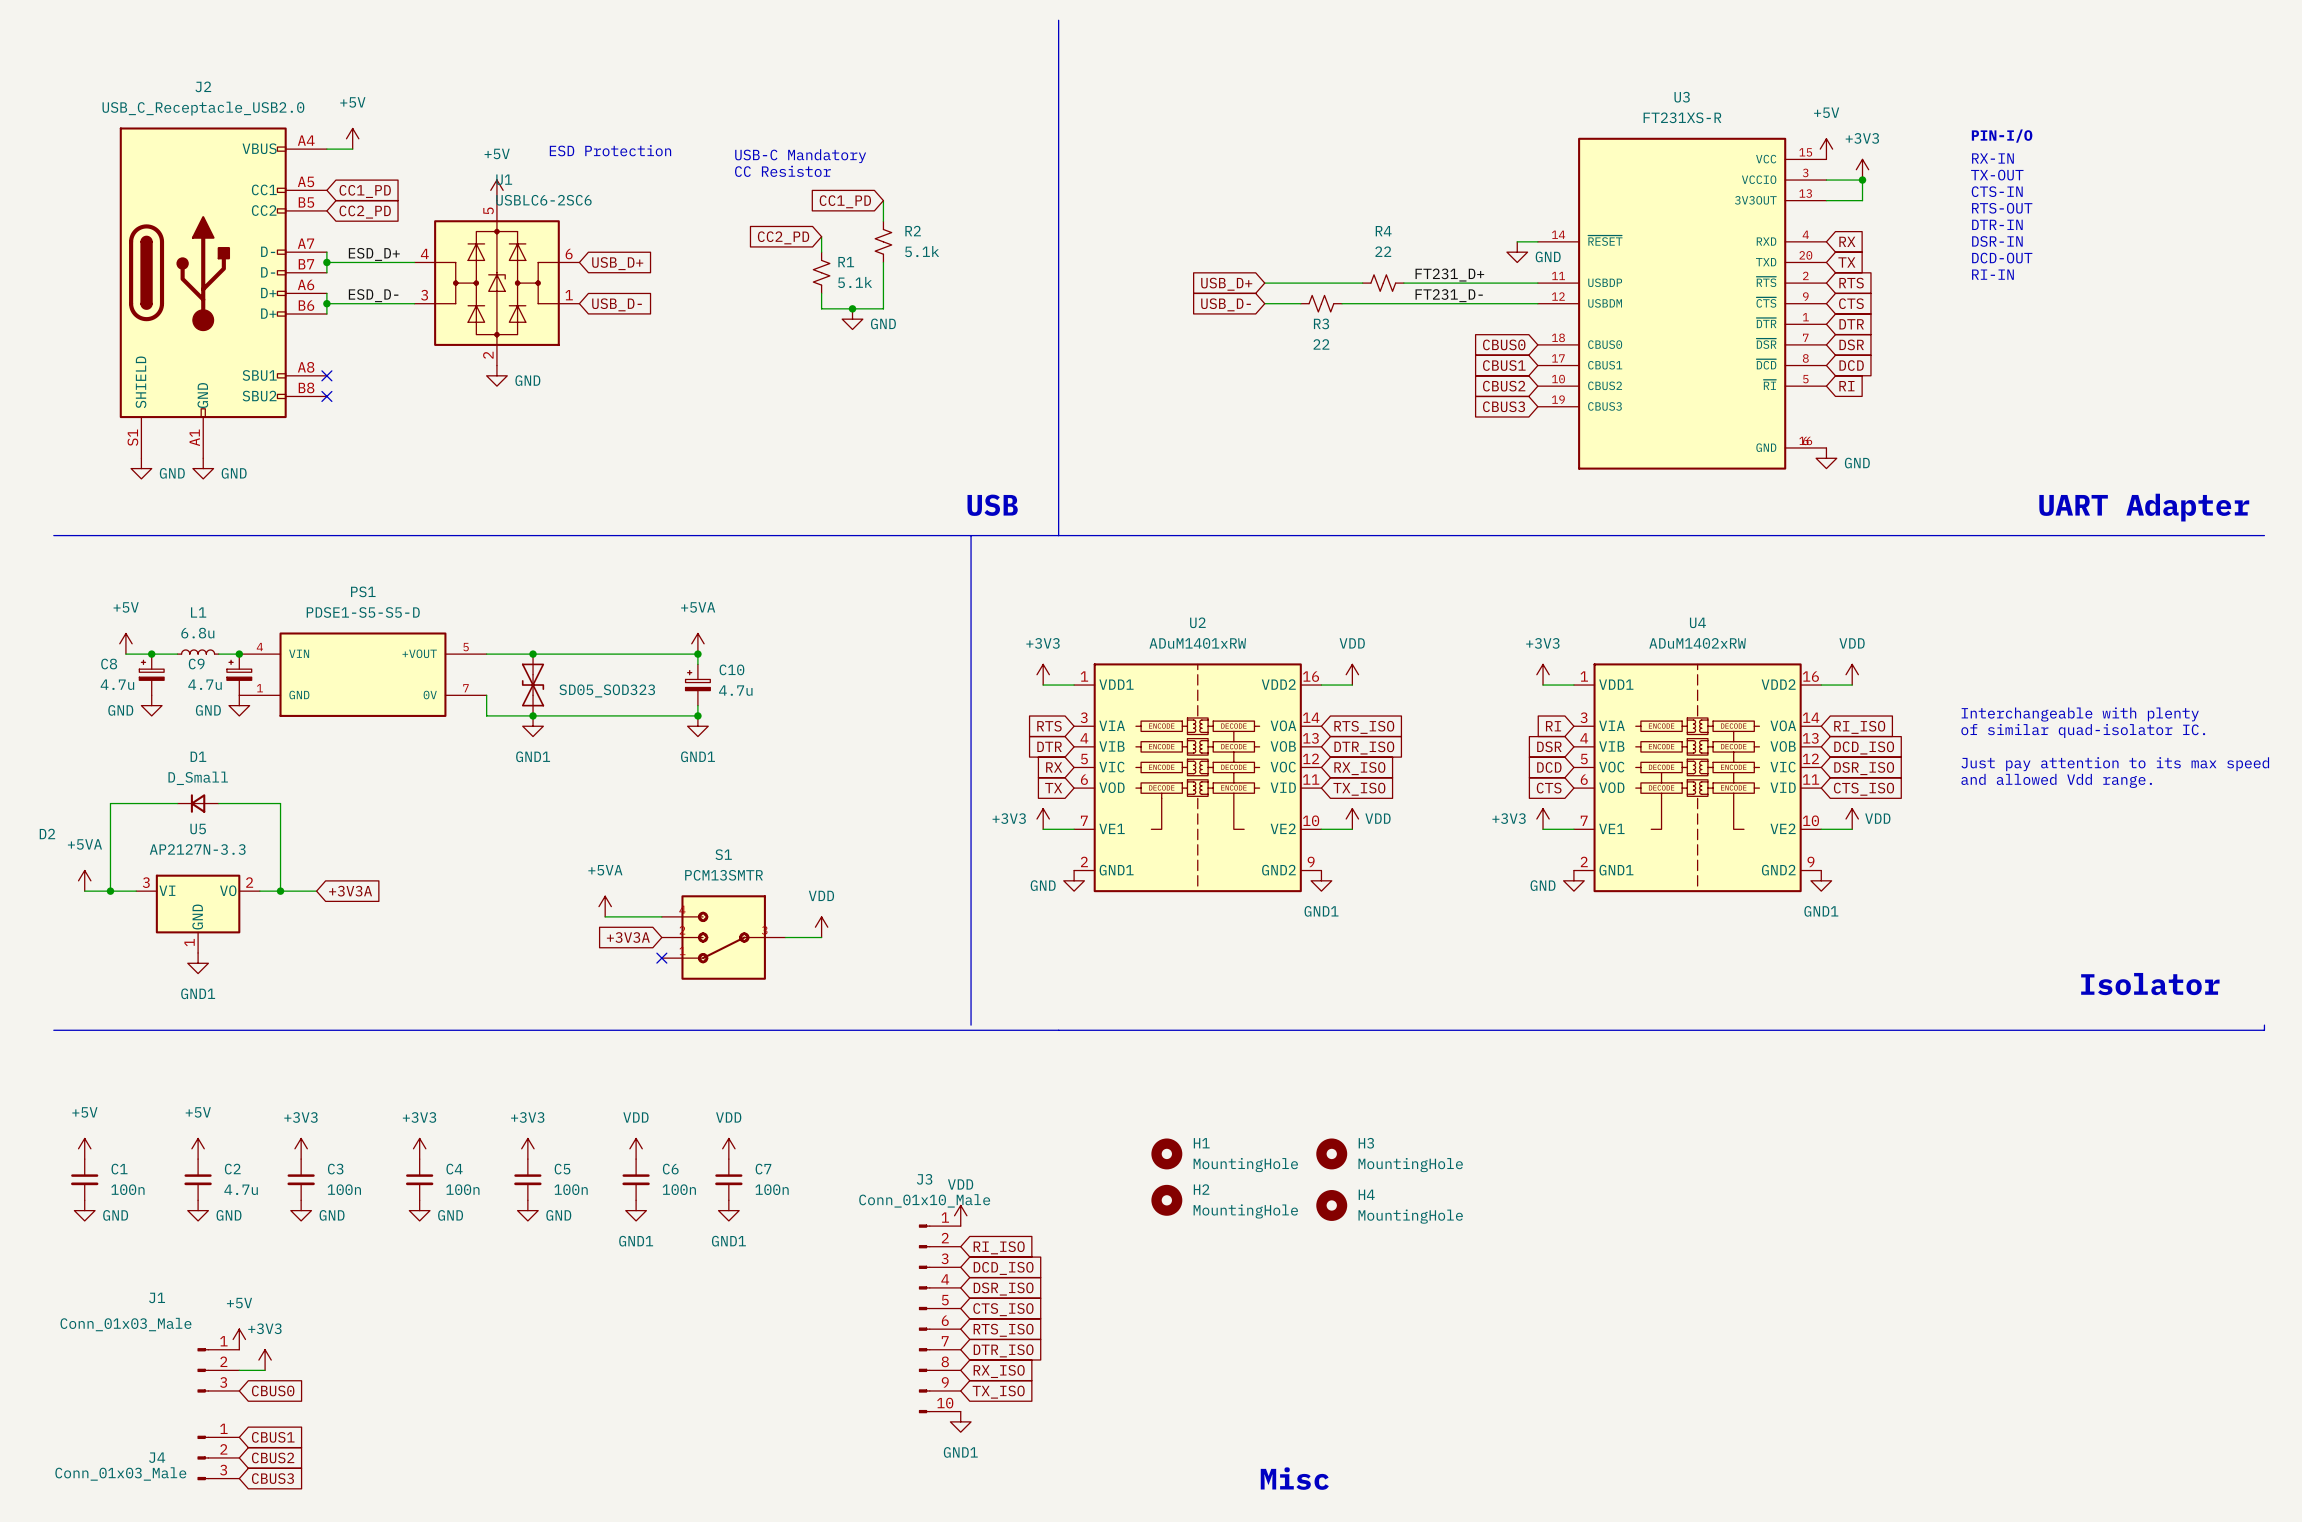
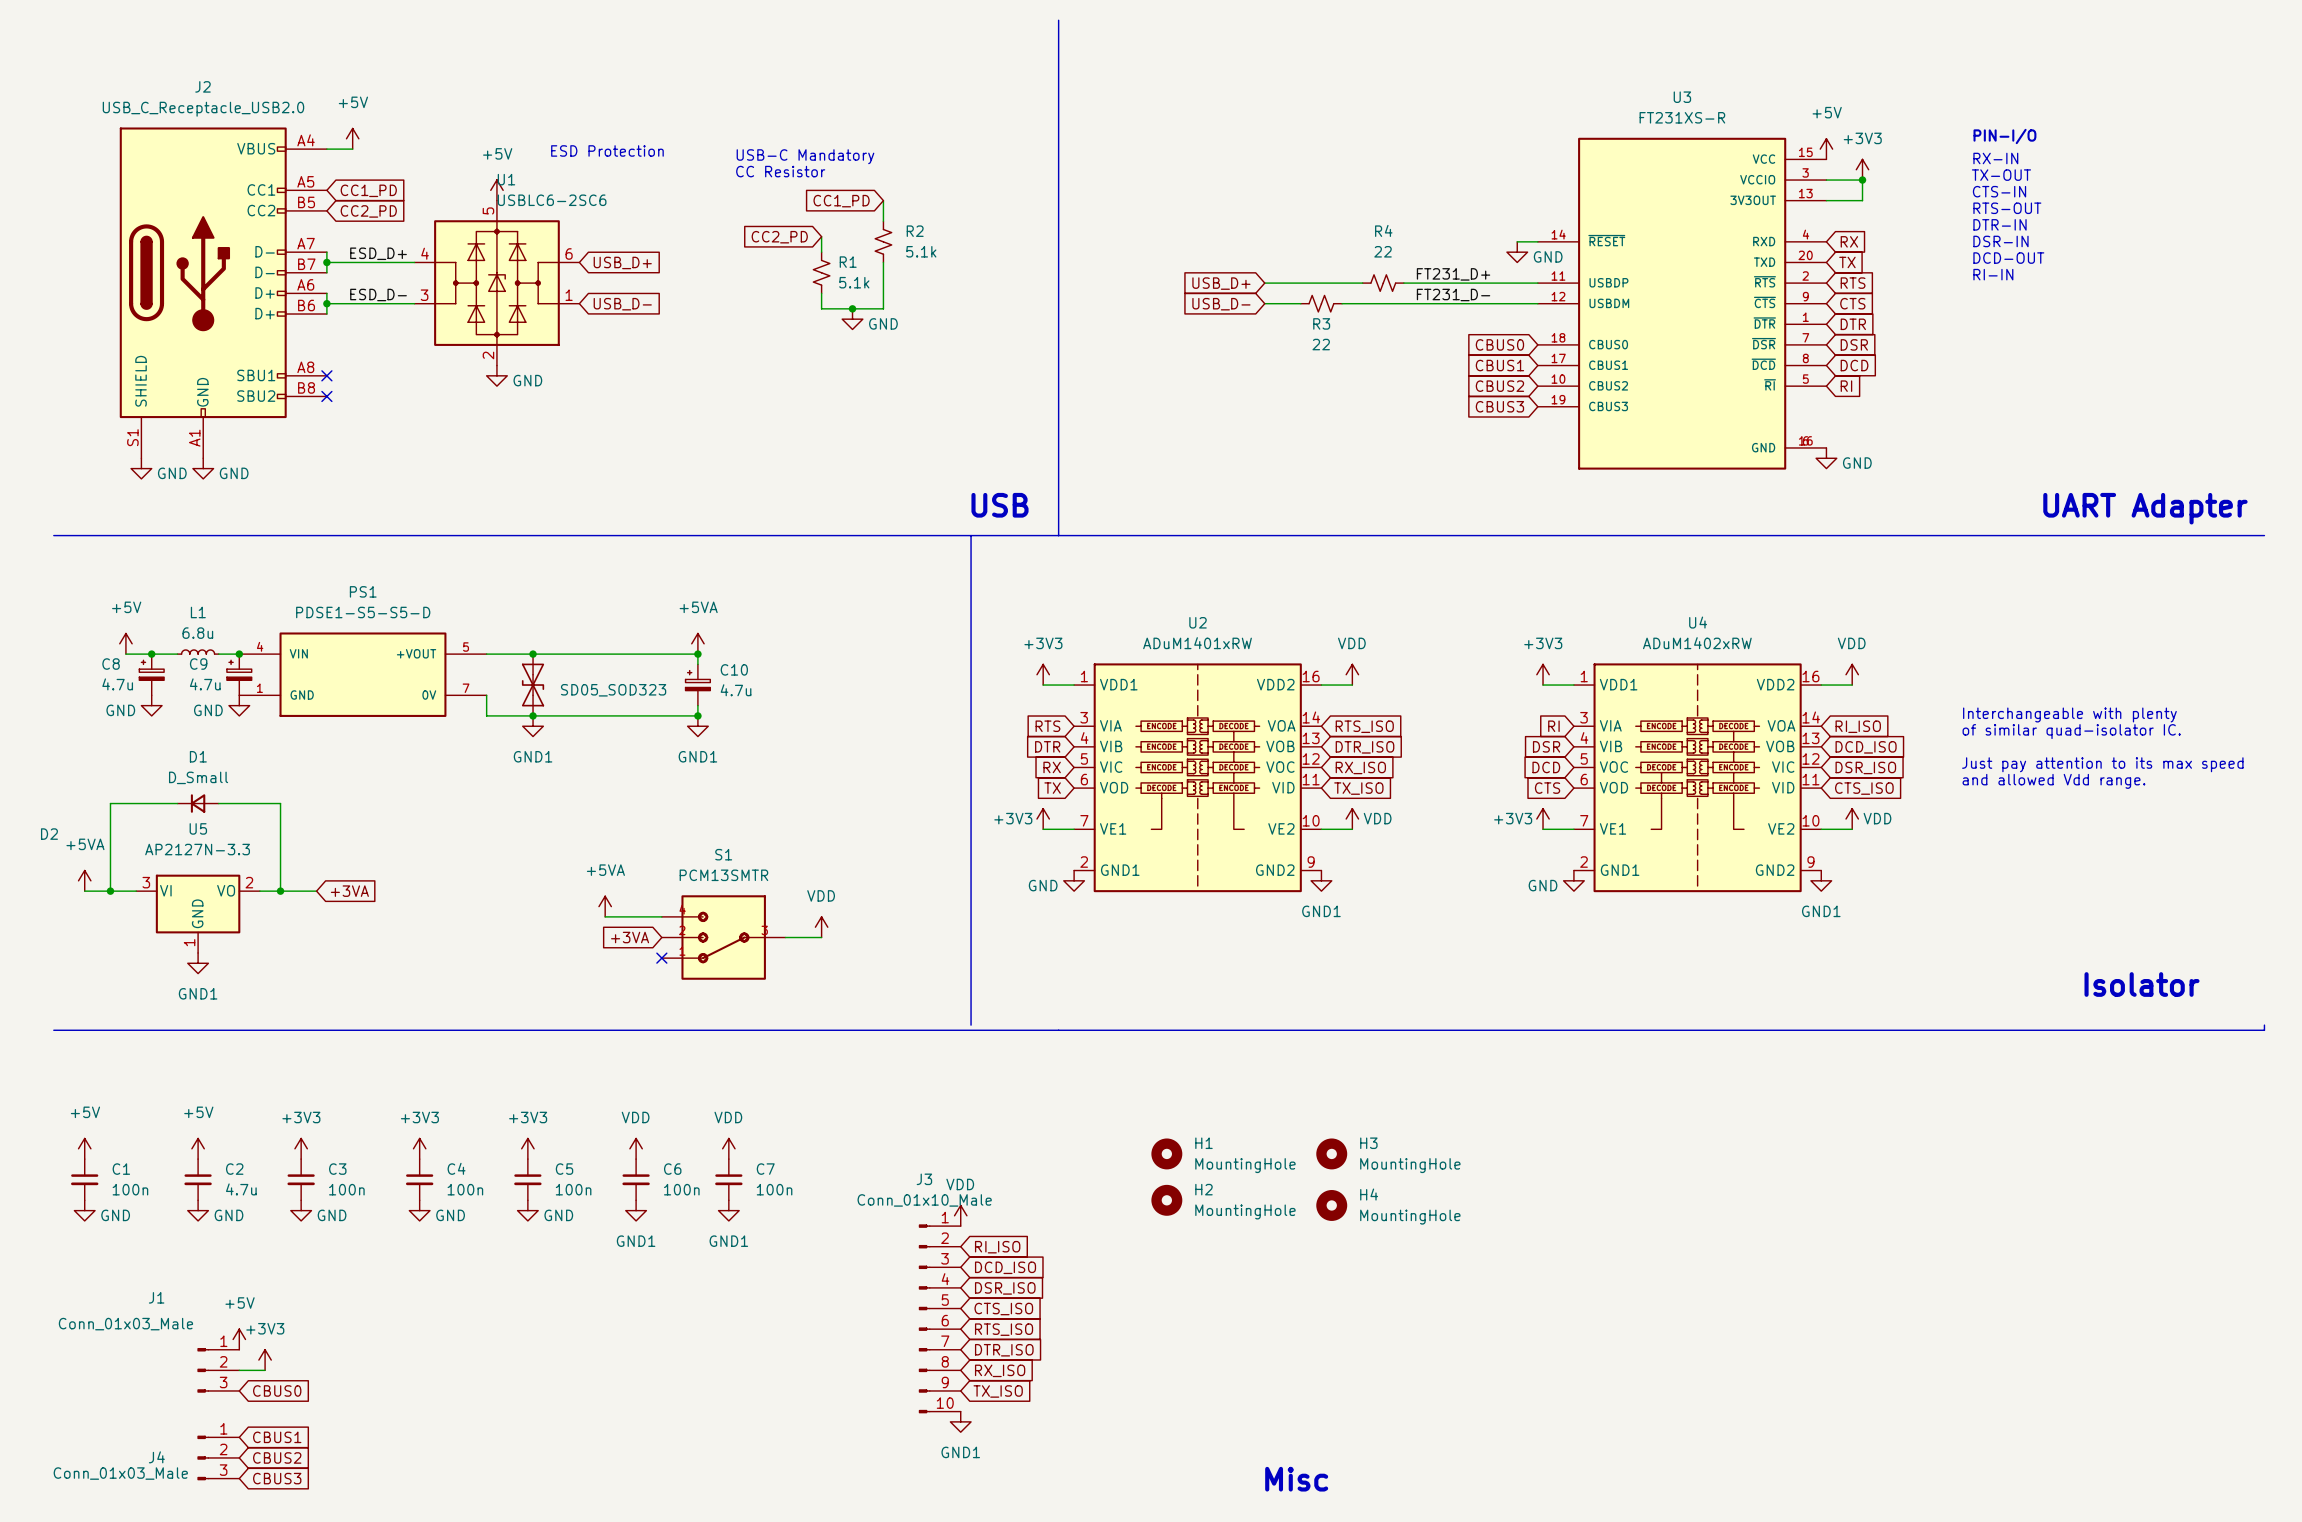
global label: +3V3A (350, 891) -> +3VA (349, 891)
global label: +3V3A (628, 937) -> +3VA (630, 937)

